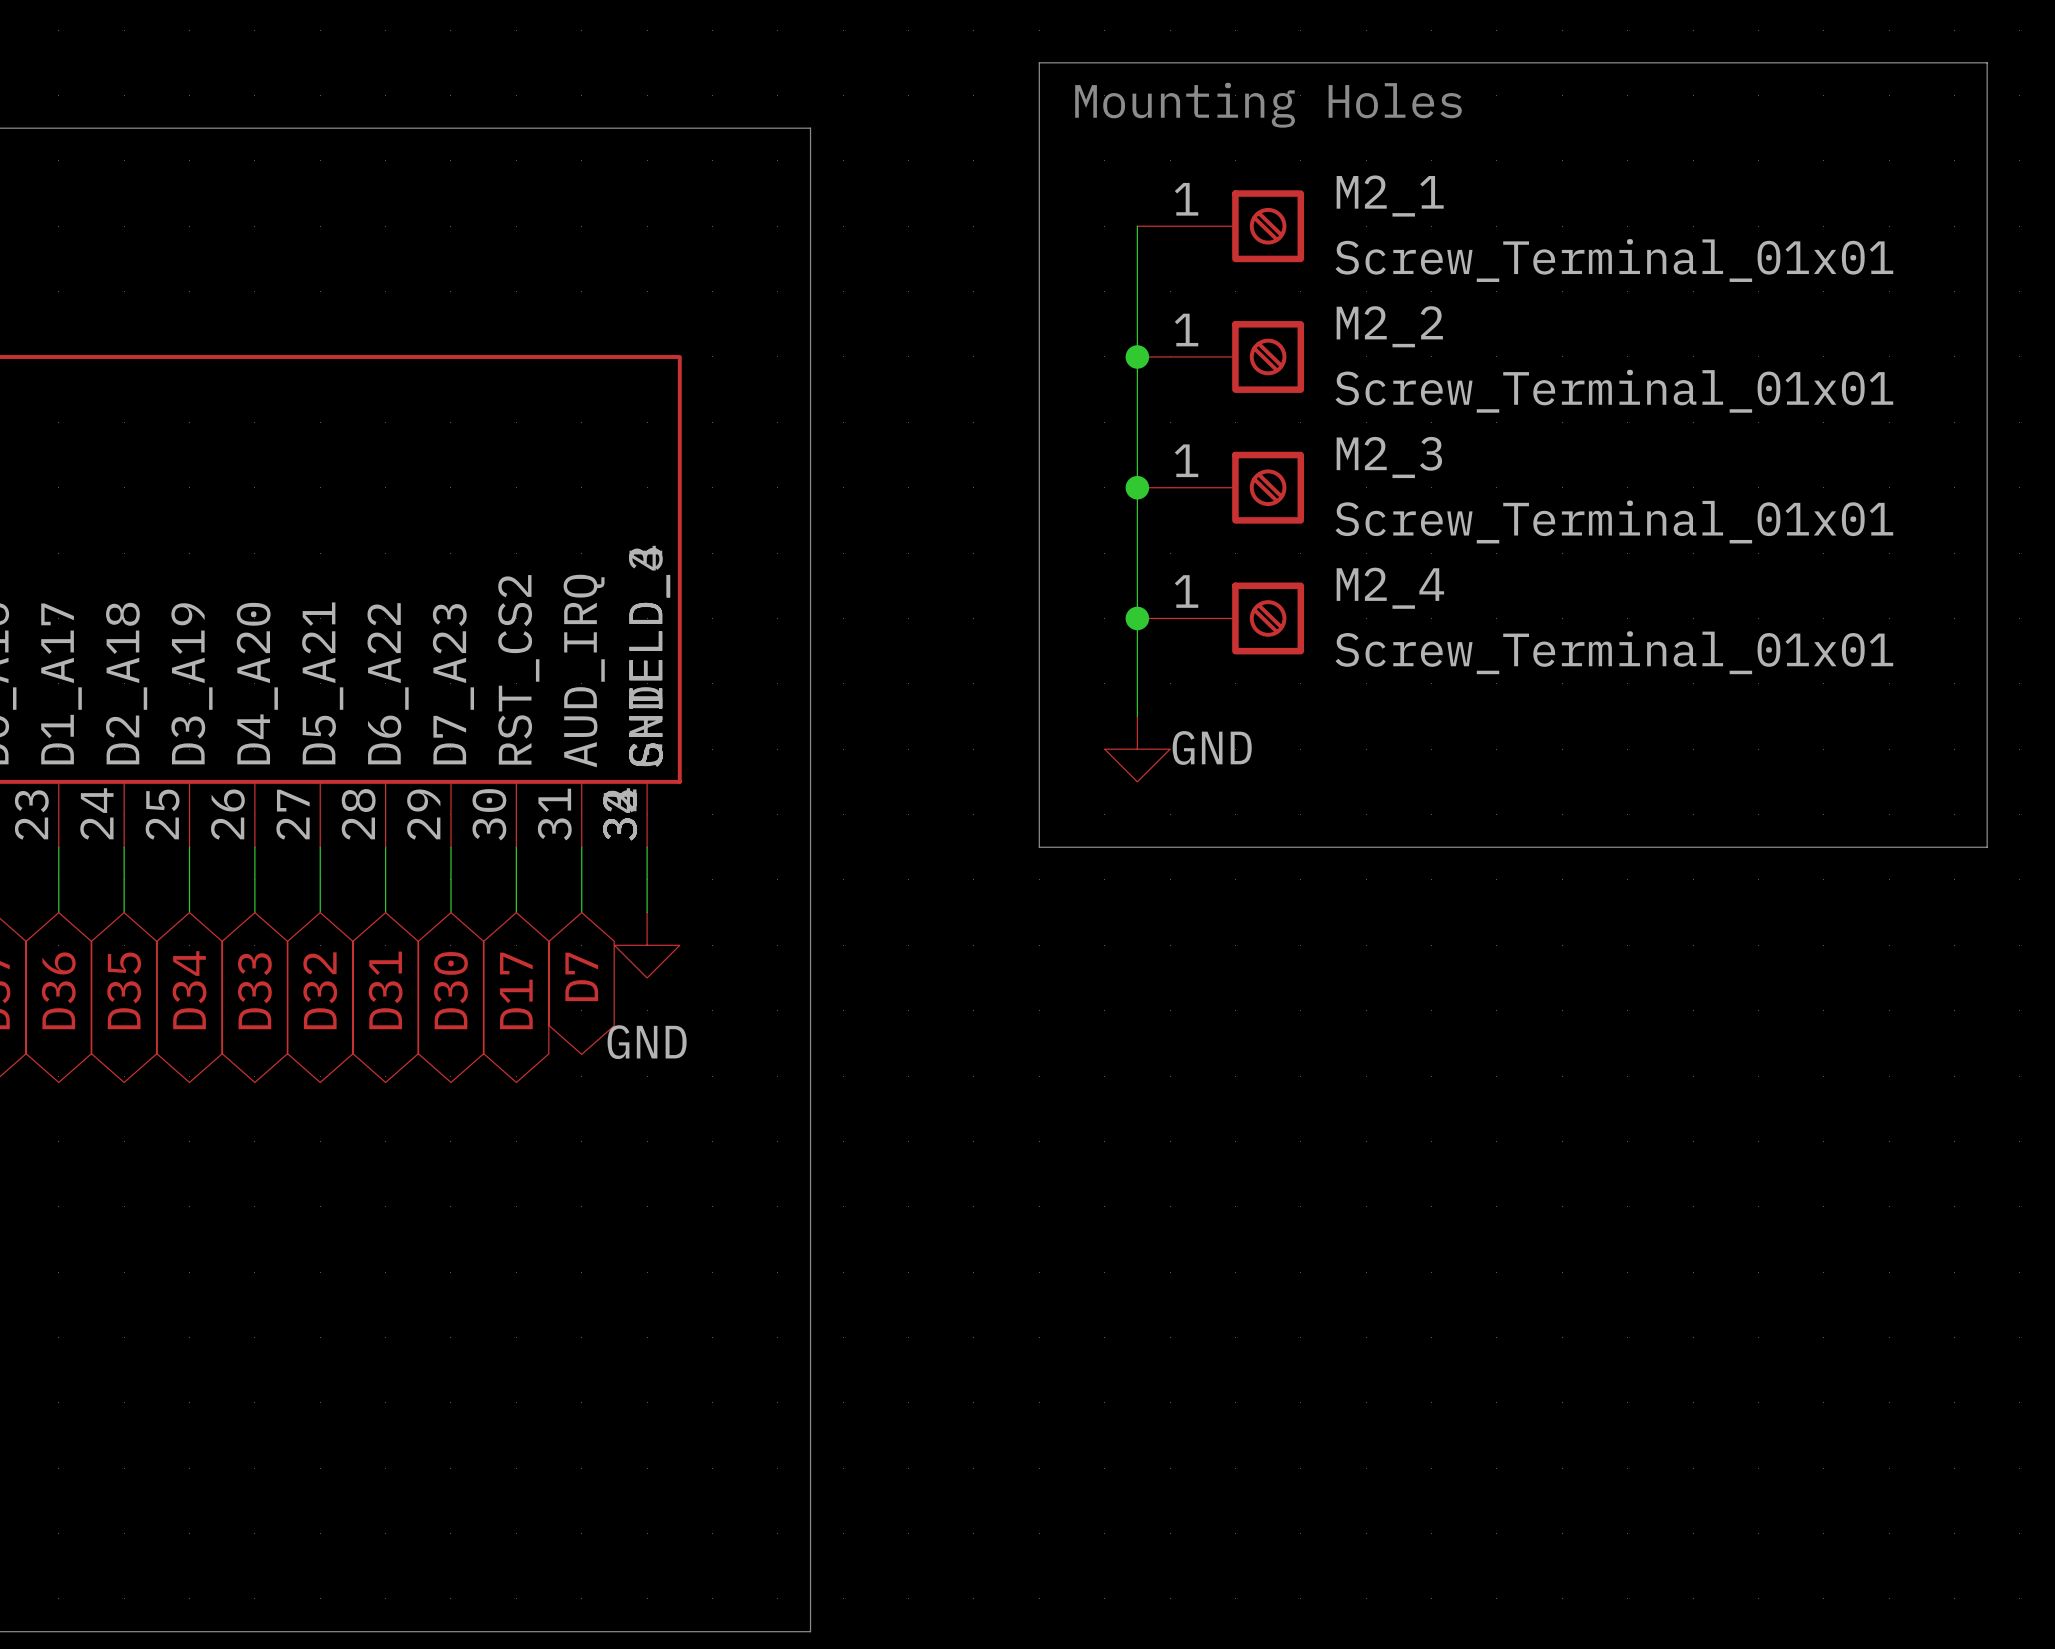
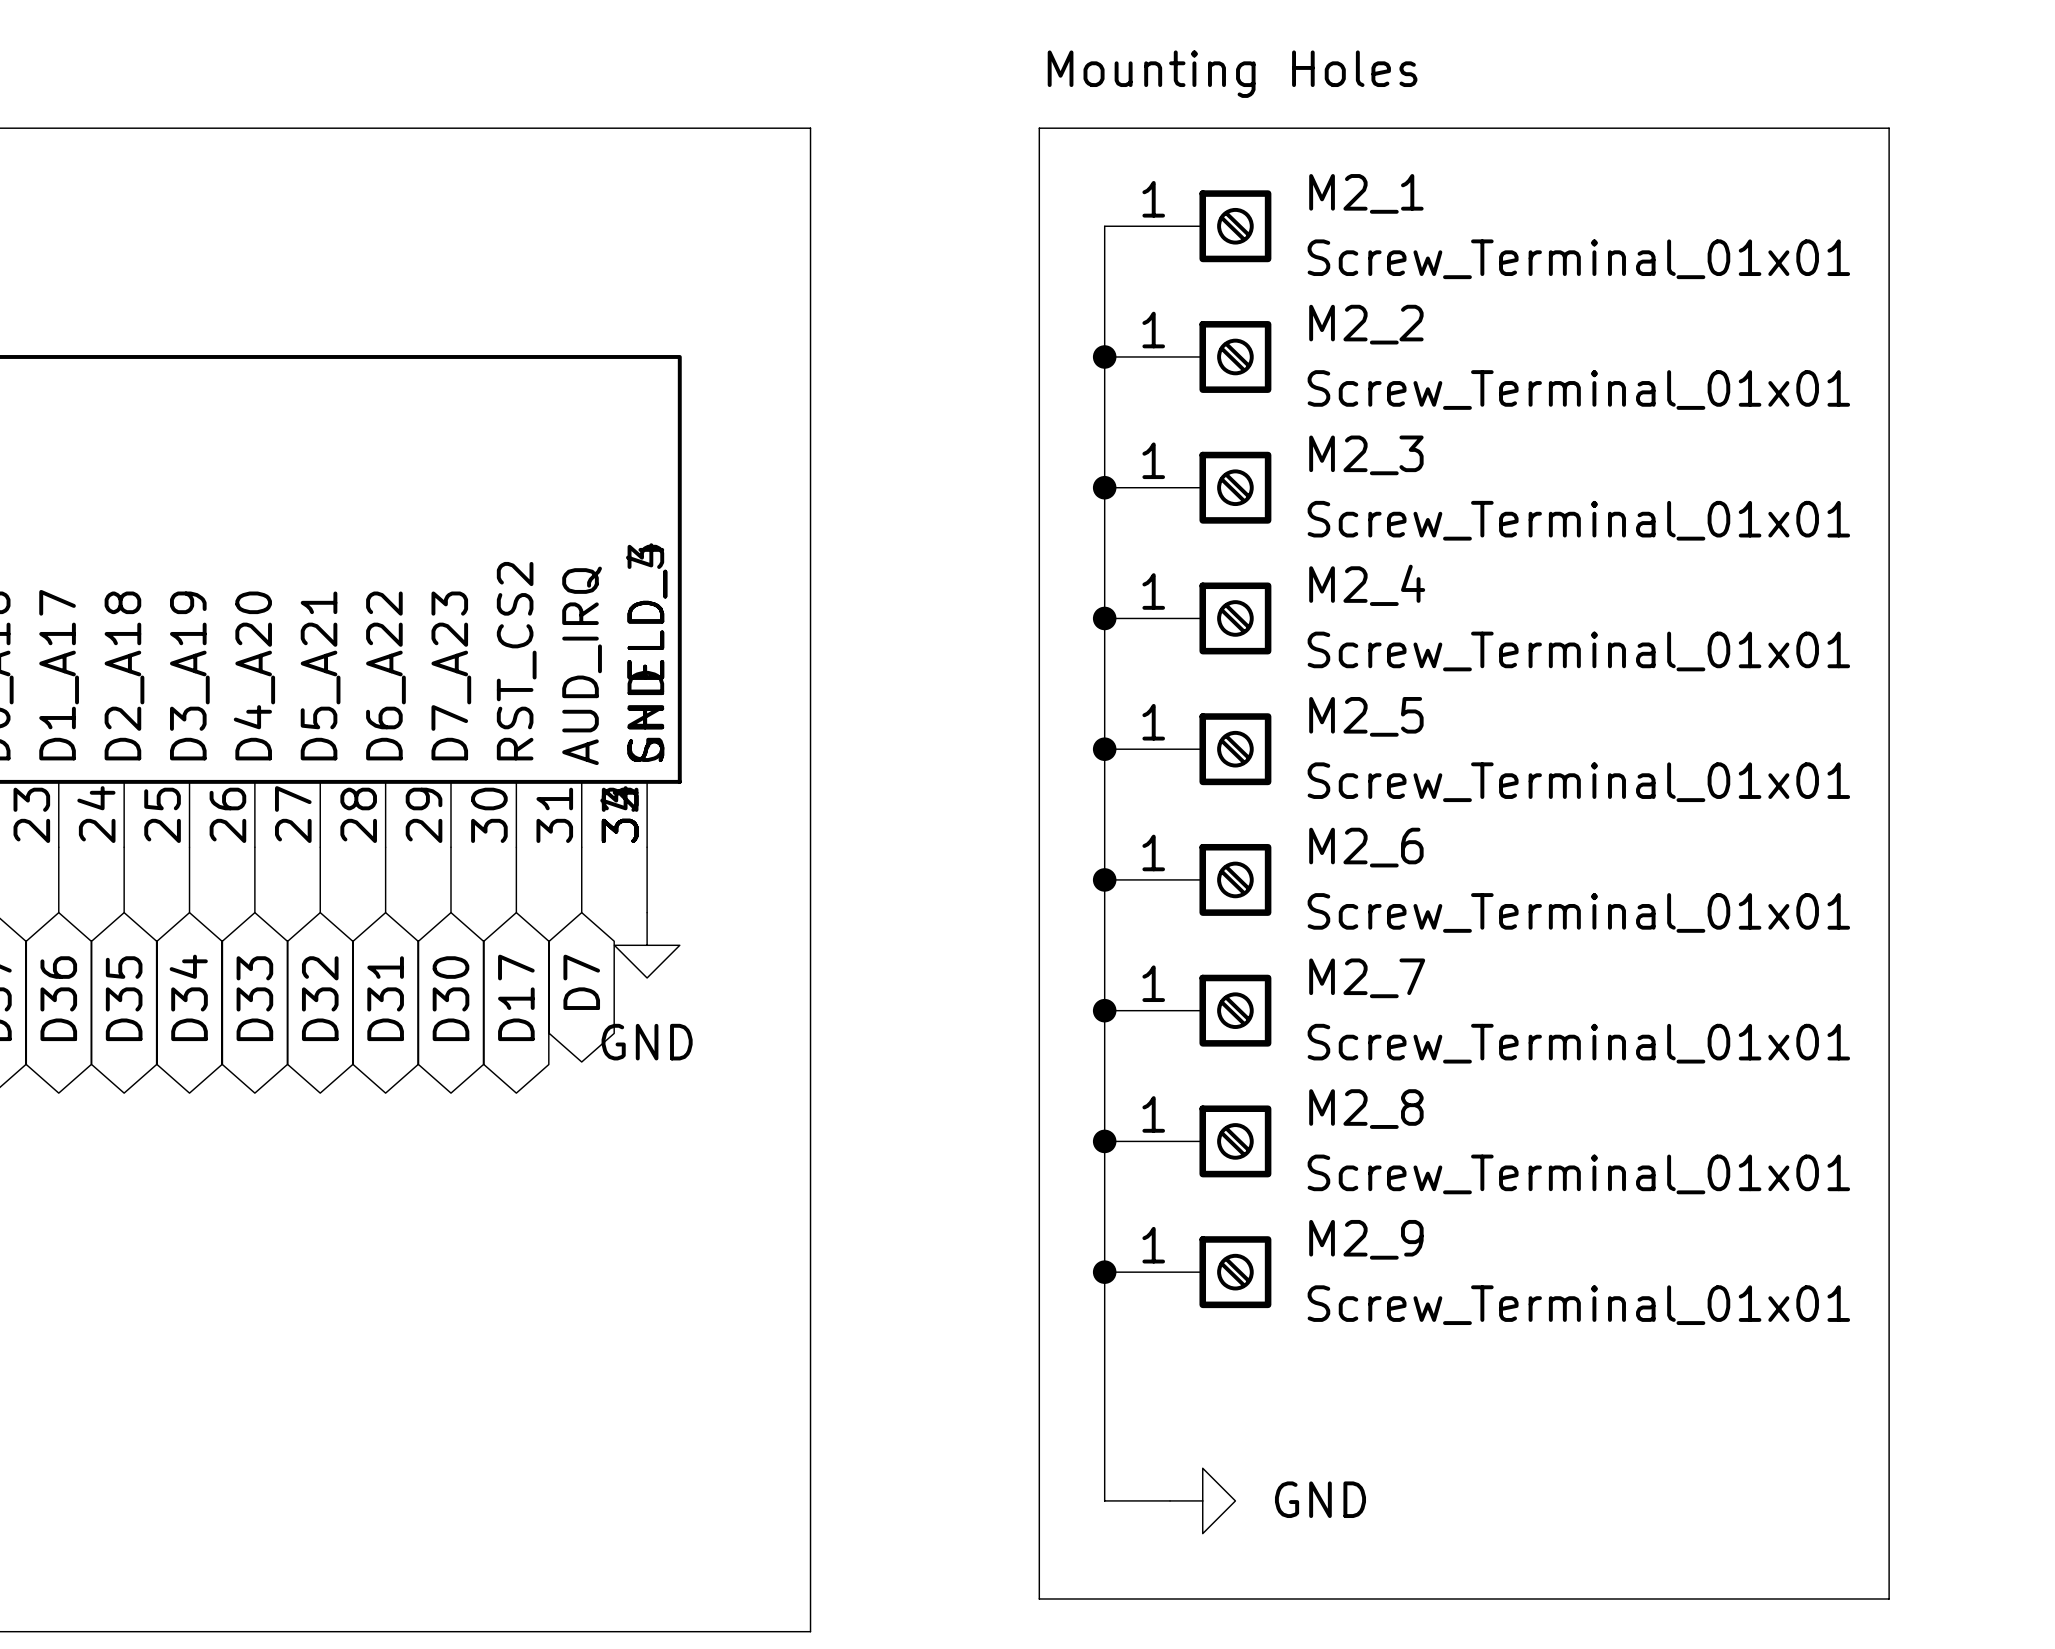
text position: Mounting Holes (1268, 105) -> Mounting Holes (1232, 74)
line: (1039, 128) (1039, 62) (1987, 62) (1987, 847) (1039, 847) -> (1039, 128) (1889, 128) (1889, 1598) (1039, 1598) (1039, 847)
wire: none -> (1104, 226) (1104, 1500) (1170, 1500)
wire: (1137, 226) (1137, 716) -> none
M2_1 position: (1220, 226) -> (1188, 226)
junction position: (1137, 356) -> (1104, 356)
M2_2 position: (1220, 356) -> (1188, 356)
junction position: (1137, 487) -> (1104, 487)
M2_3 position: (1220, 487) -> (1188, 487)
junction position: (1137, 618) -> (1104, 618)
M2_4 position: (1220, 618) -> (1188, 618)
junction: none -> (1104, 749)
power symbol: GND (1137, 749) -> none
M2_5: none -> Screw_Terminal_01x01 (1188, 749)
junction: none -> (1104, 879)
M2_6: none -> Screw_Terminal_01x01 (1188, 879)
junction: none -> (1104, 1010)
M2_7: none -> Screw_Terminal_01x01 (1188, 1010)
junction: none -> (1104, 1141)
M2_8: none -> Screw_Terminal_01x01 (1188, 1141)
junction: none -> (1104, 1272)
M2_9: none -> Screw_Terminal_01x01 (1188, 1272)
power symbol: none -> GND (1202, 1500)

